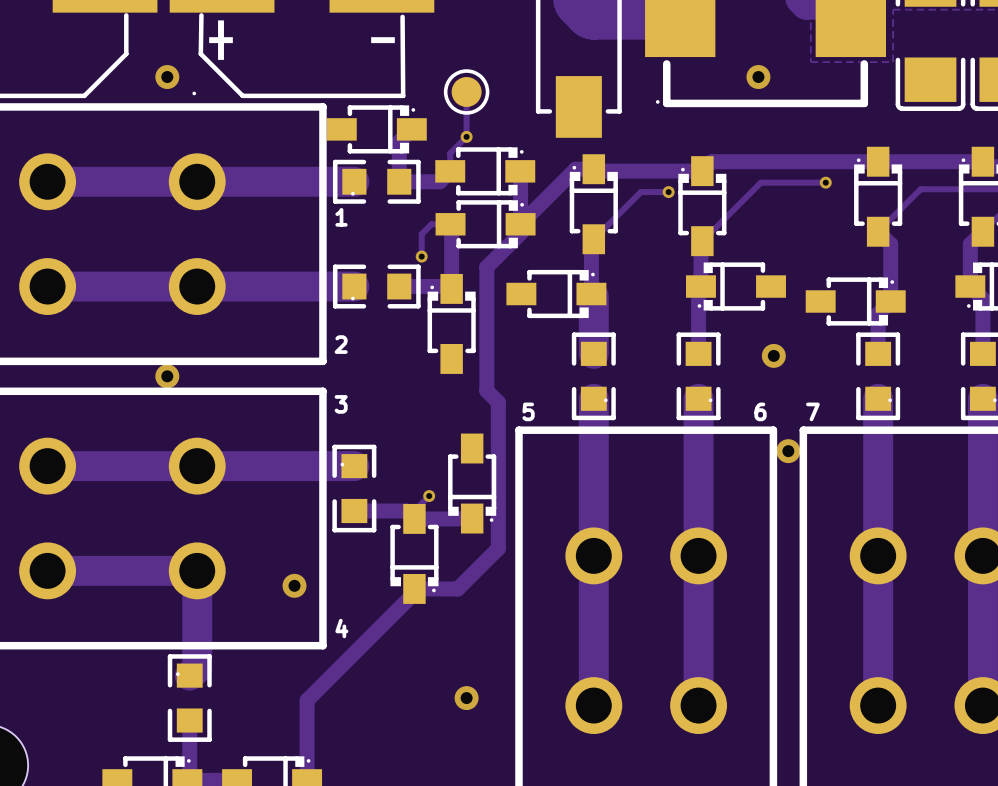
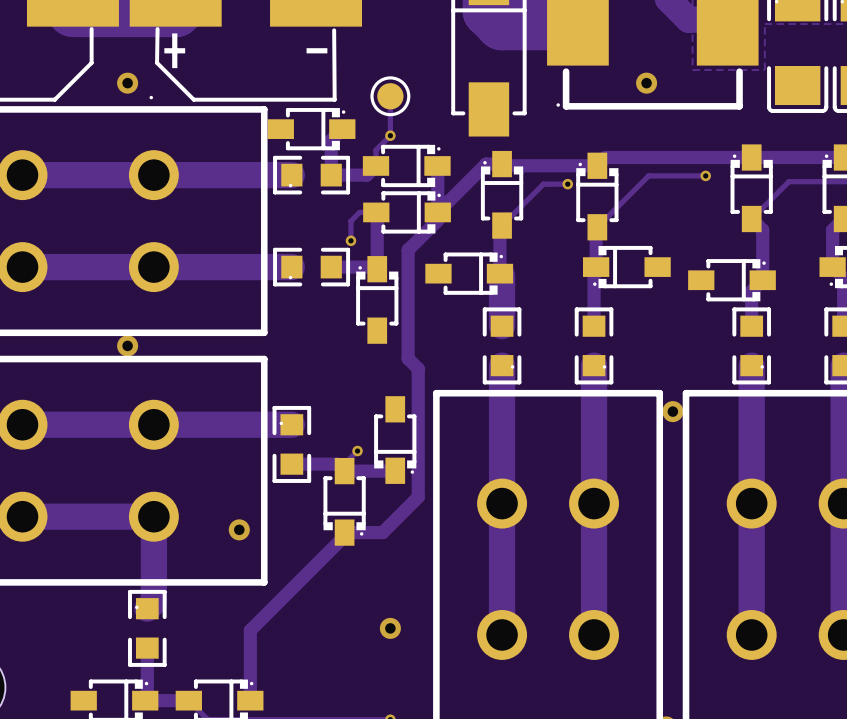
text: 1 (341, 217) -> none
text: 2 (341, 344) -> none
via: (773, 355) -> none
text: 3 (341, 404) -> none
text: 5 (528, 411) -> none
text: 6 (760, 411) -> none
text: 7 (812, 411) -> none
text: 4 (341, 628) -> none

